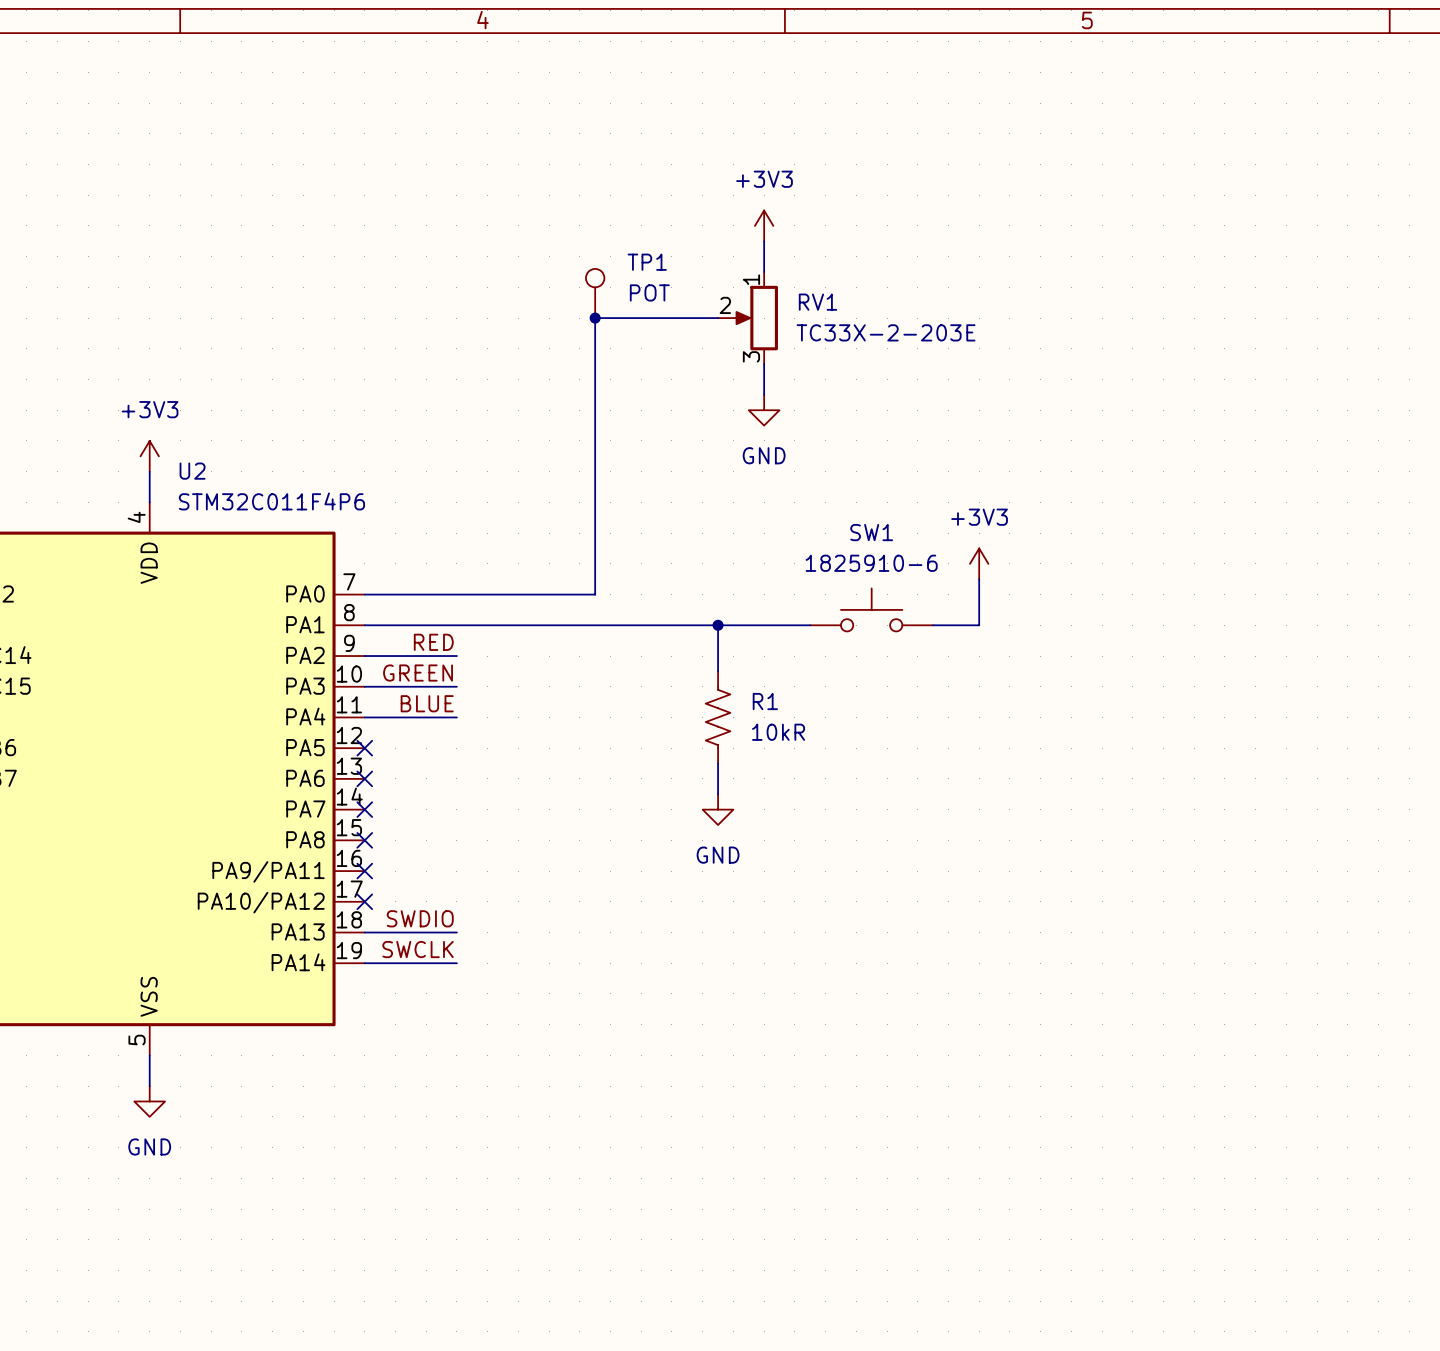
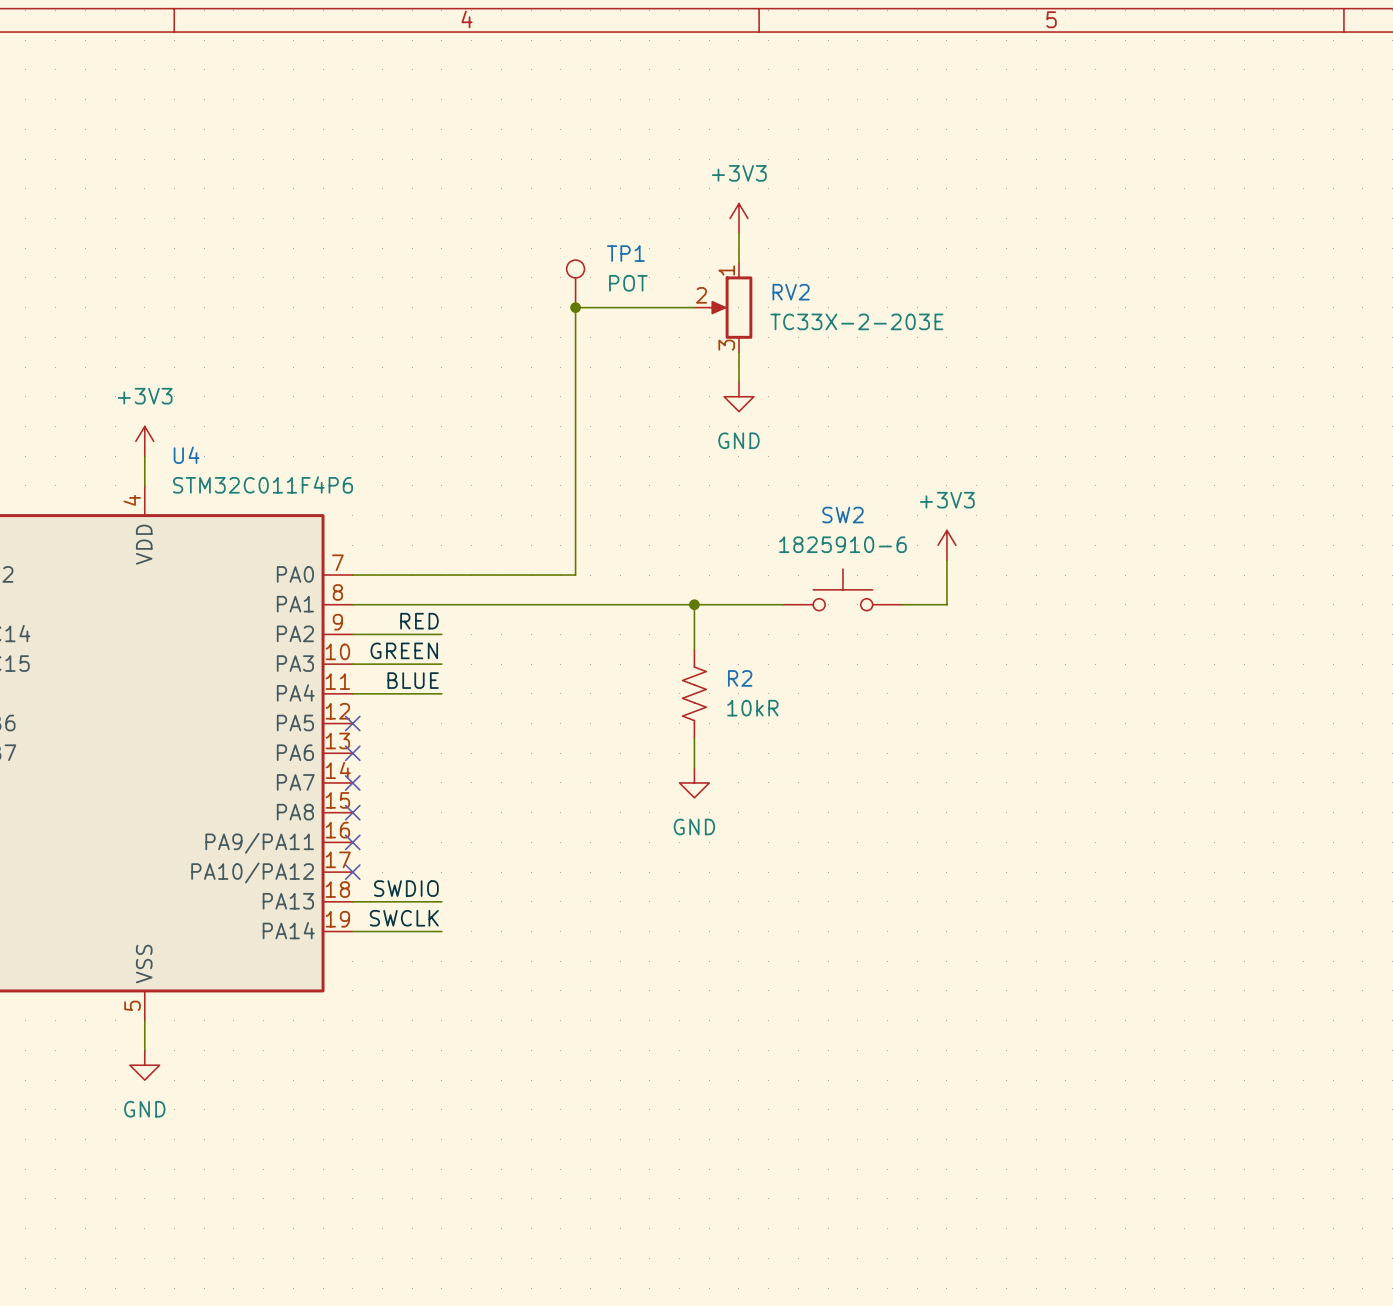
RV1 name: RV1 (818, 302) -> RV2 (791, 292)
U2 name: U2 (192, 471) -> U4 (186, 455)
SW1 name: SW1 (871, 532) -> SW2 (842, 515)
R1 name: R1 (765, 701) -> R2 (740, 678)

